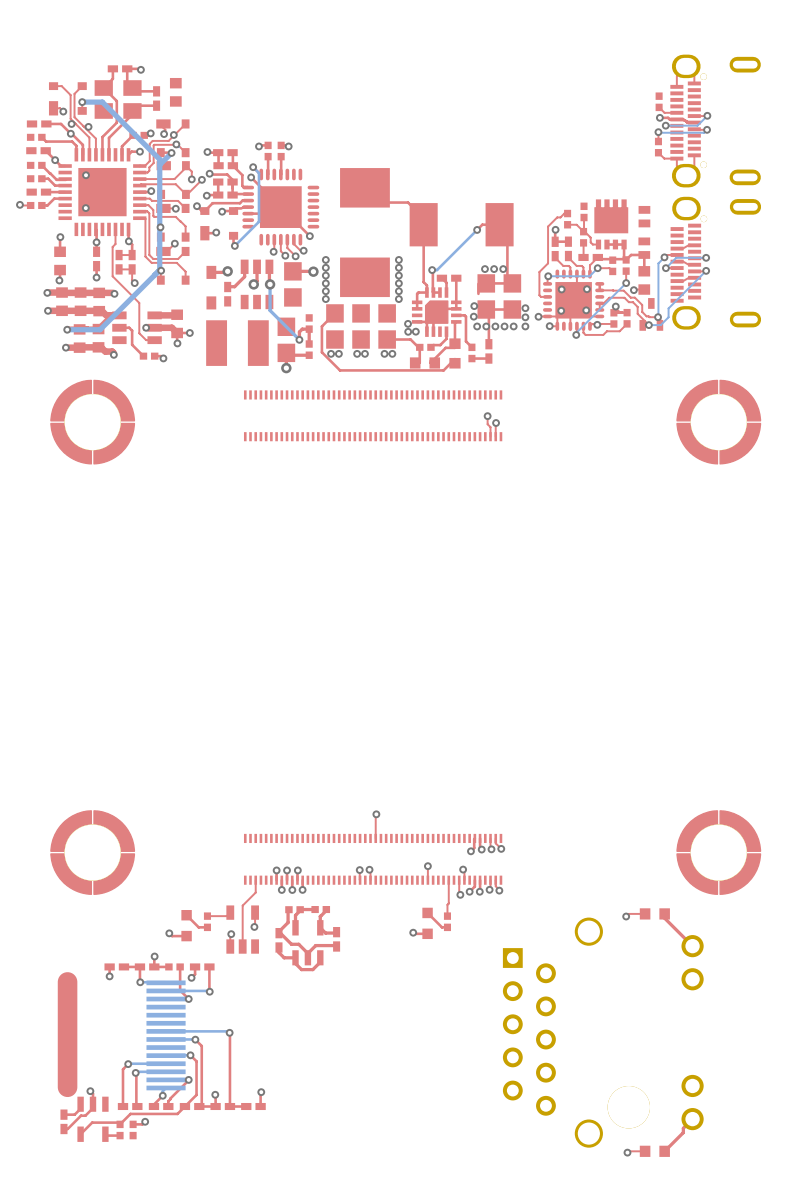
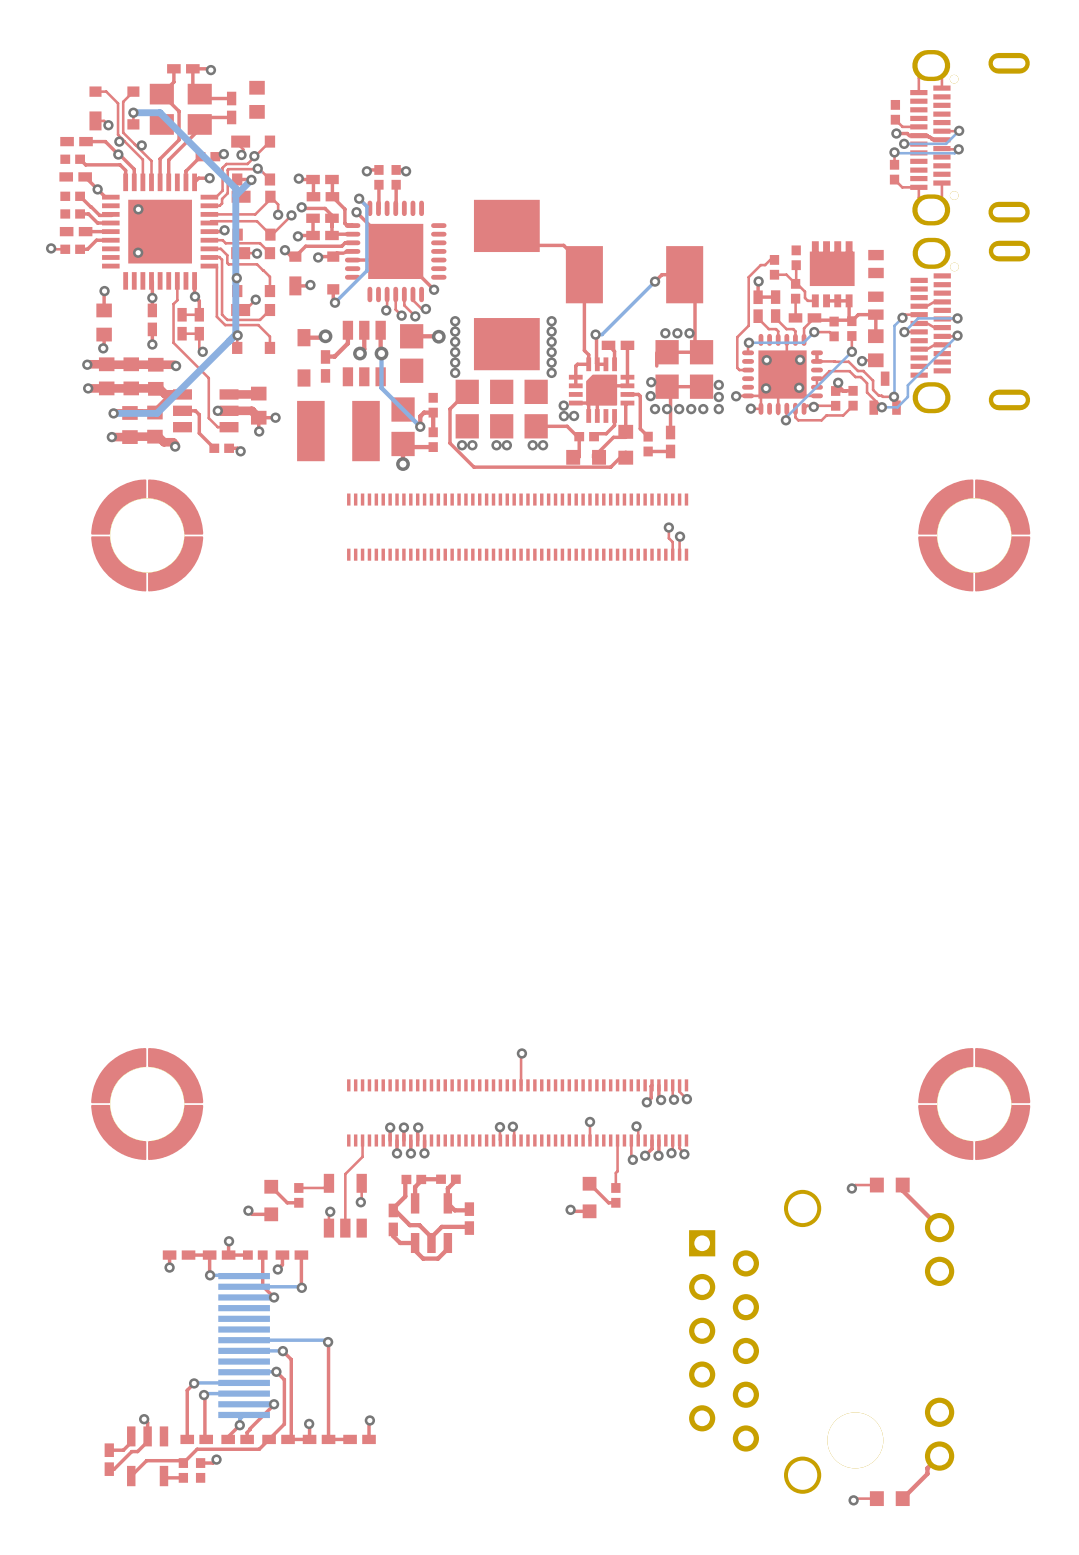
drawing: [57, 972, 78, 1098] -> none

